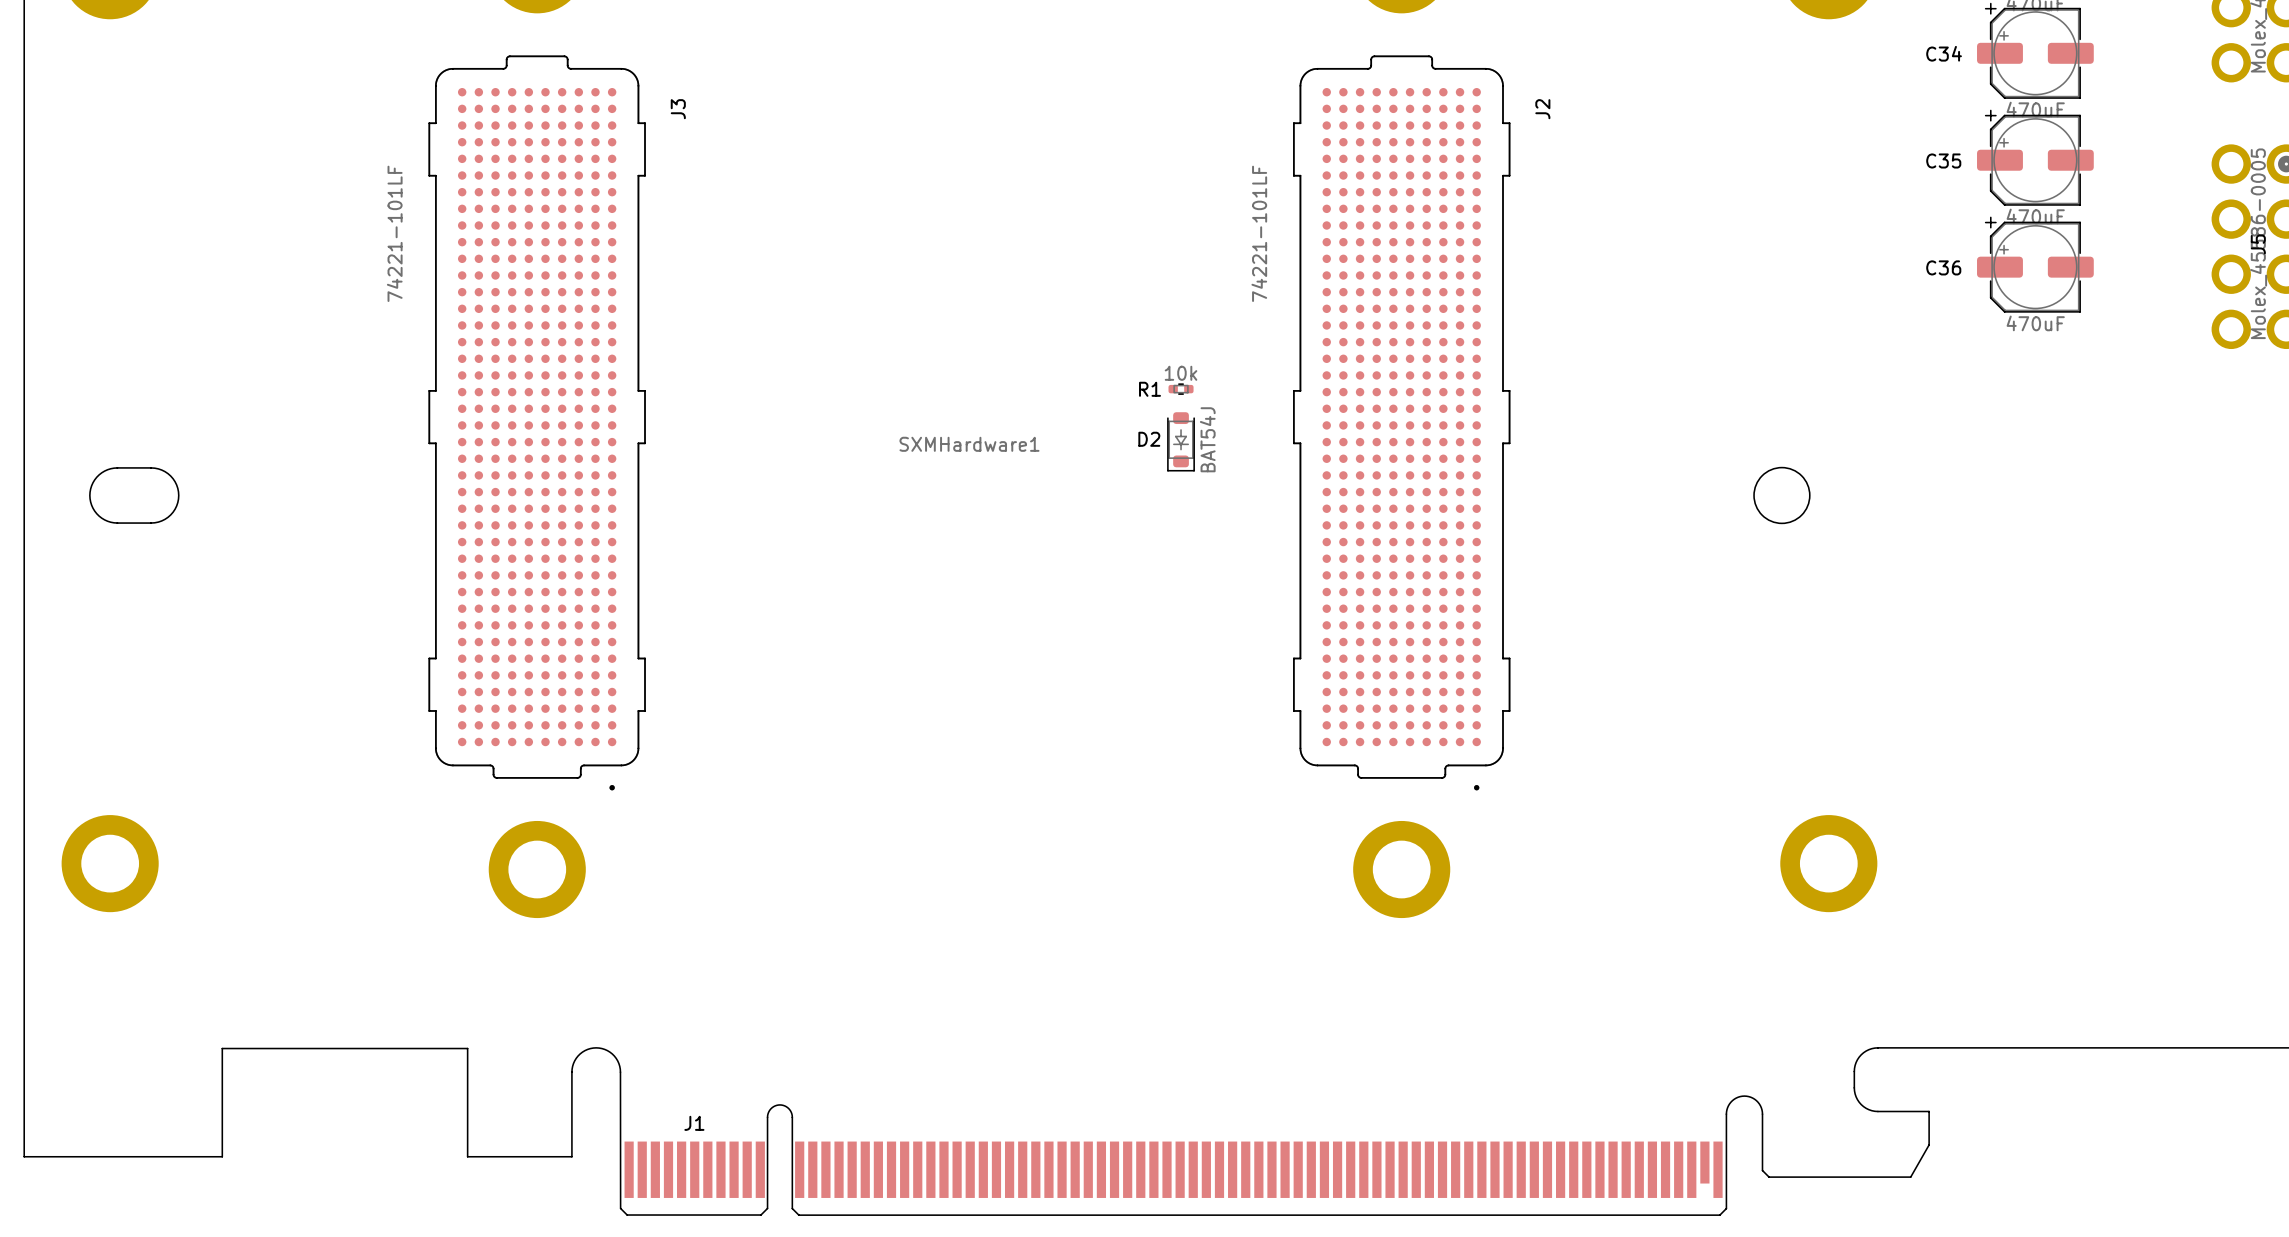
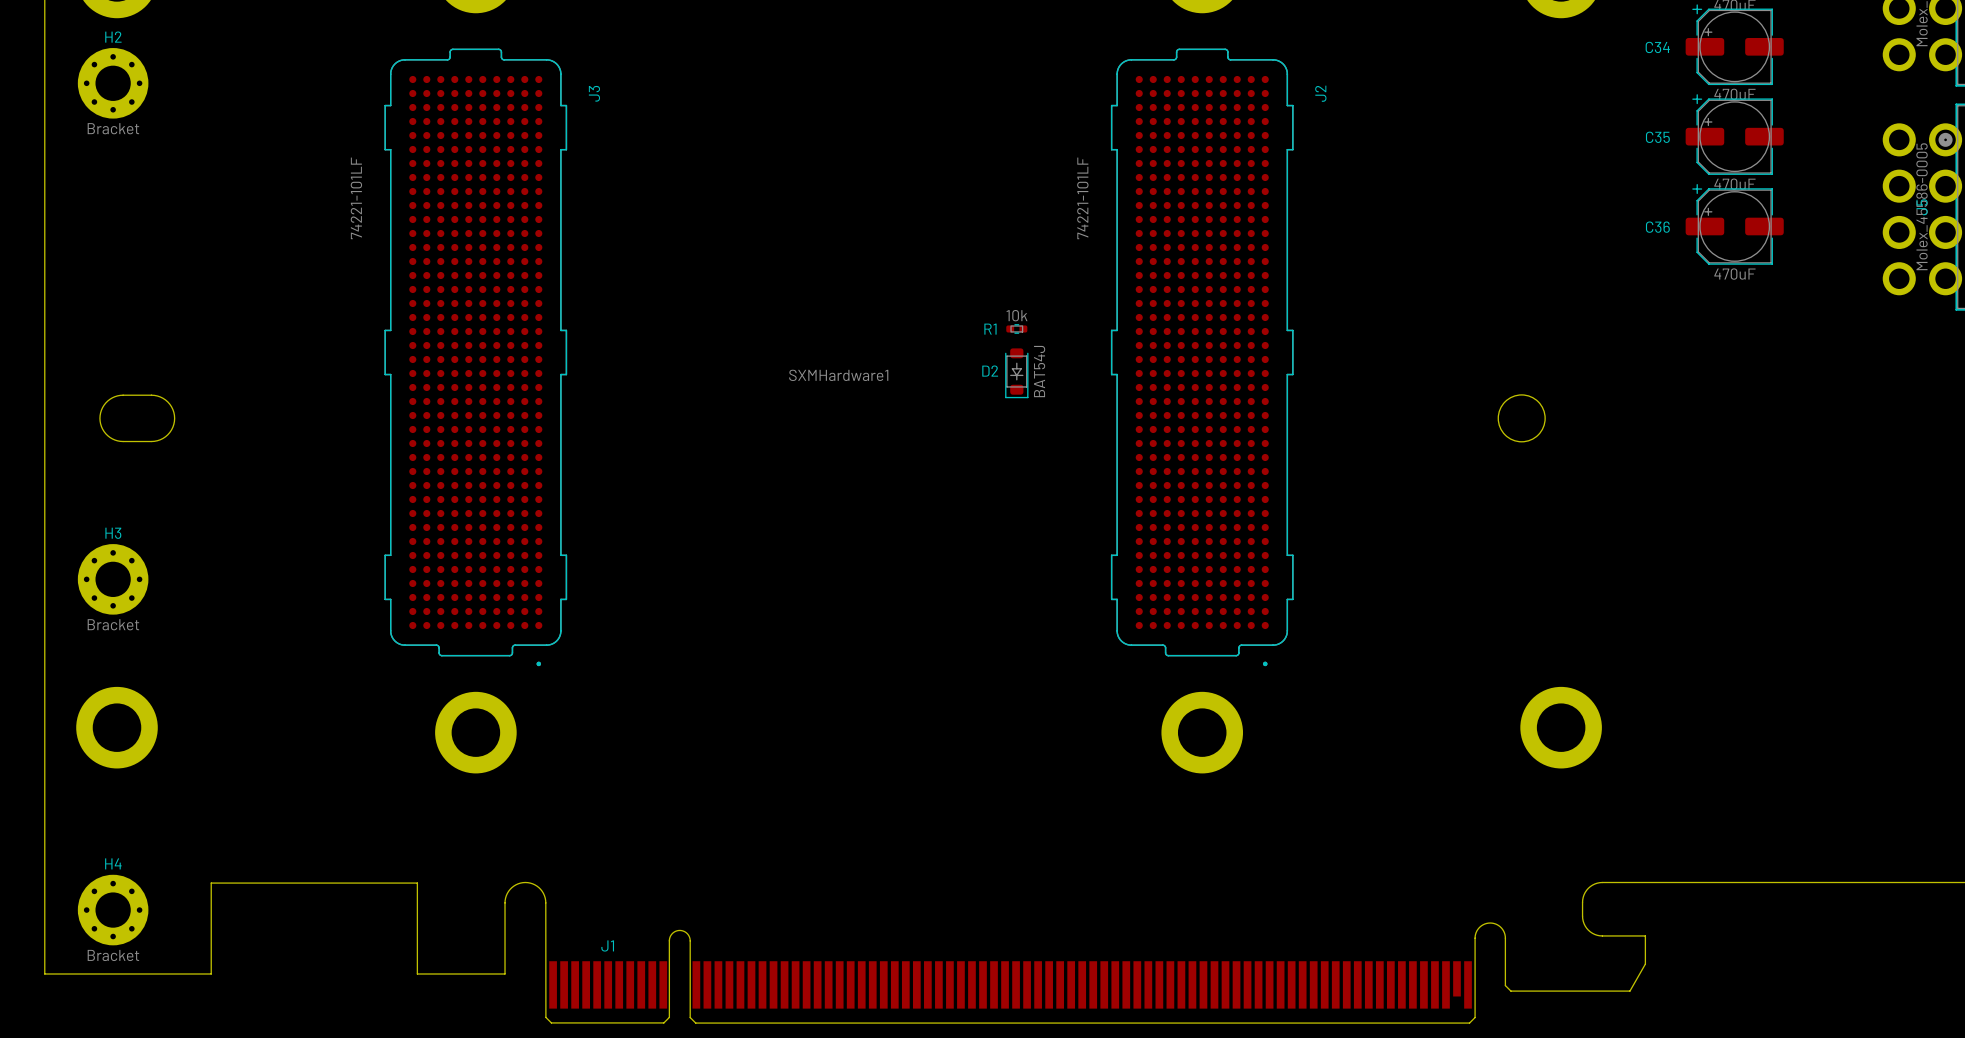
H2: none -> Bracket (113, 83)
H3: none -> Bracket (113, 579)
H4: none -> Bracket (113, 910)

